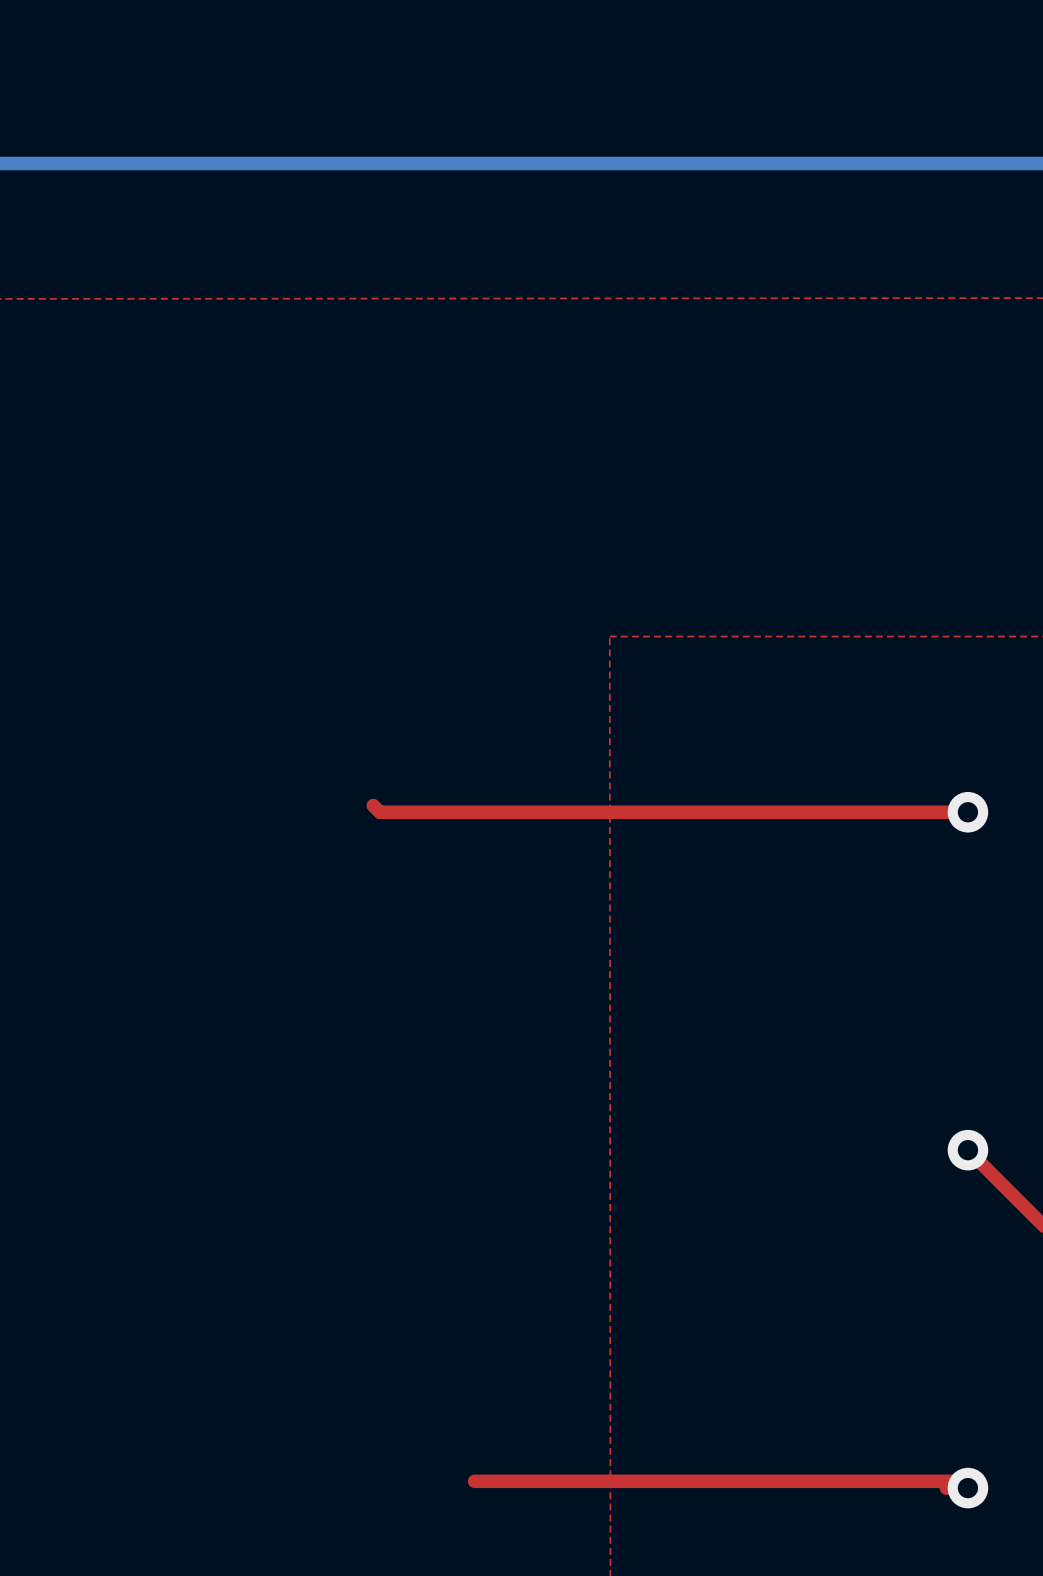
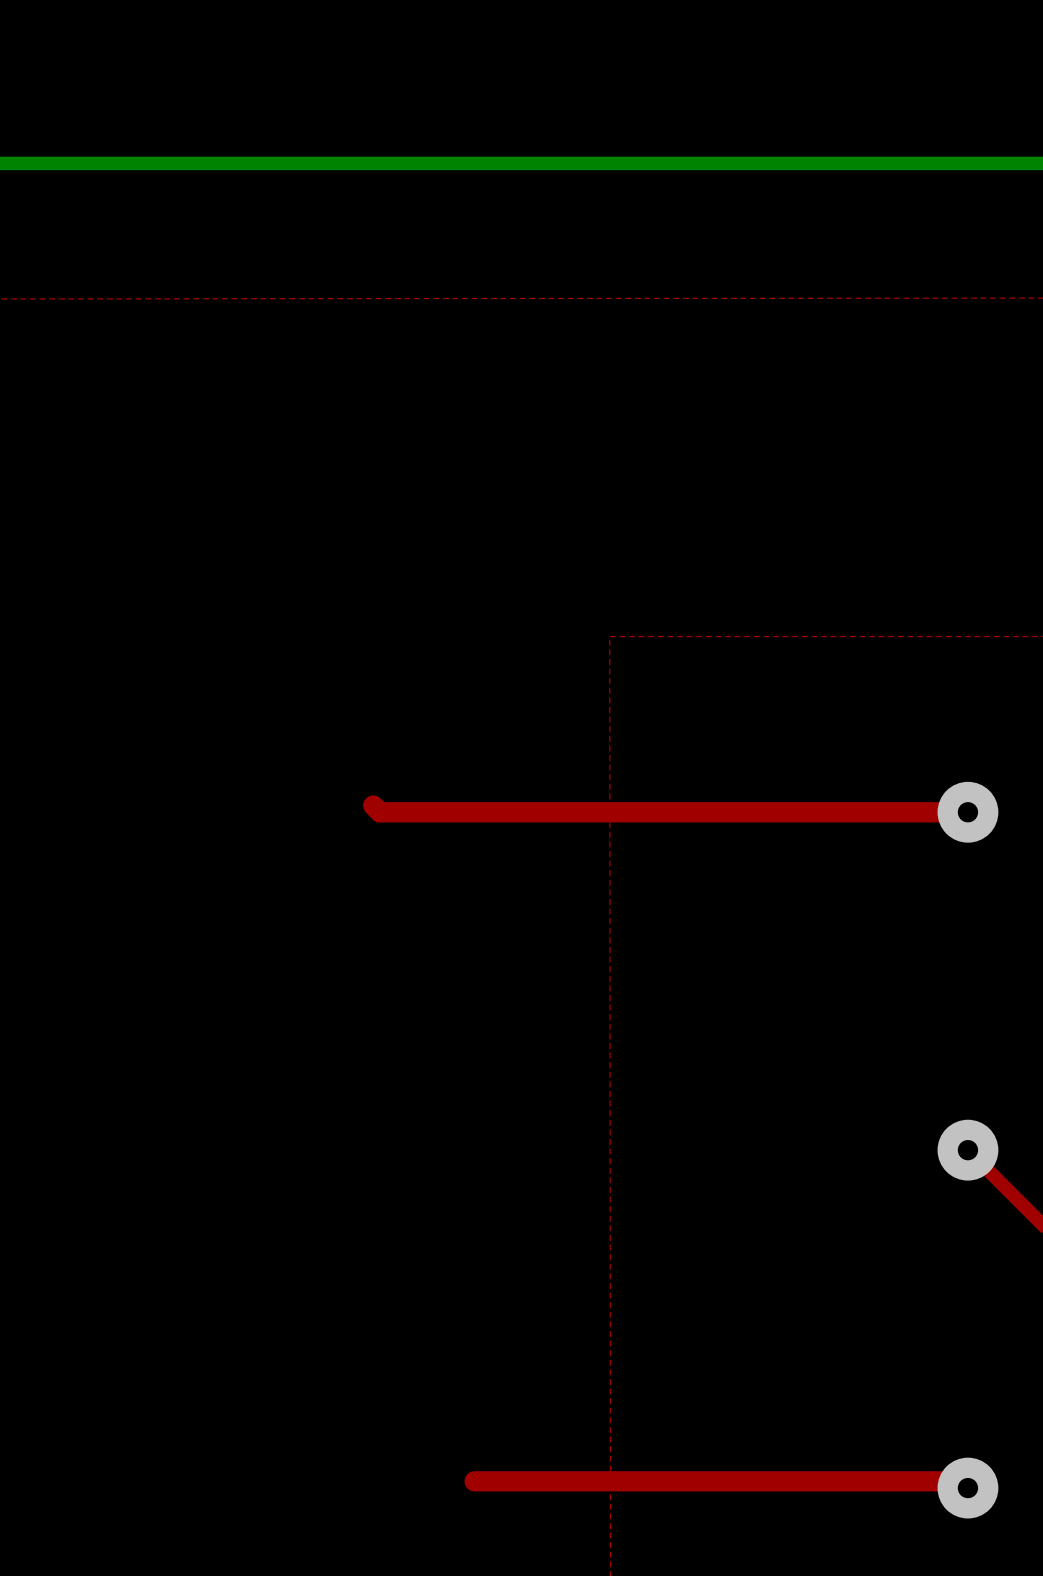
via size: [947, 791, 989, 833] -> [937, 781, 999, 843]
top track width: thin (373, 805) (379, 812) (967, 812) -> thick (373, 805) (379, 812) (967, 812)
via size: [947, 1129, 989, 1171] -> [937, 1119, 999, 1181]
via size: [947, 1467, 989, 1509] -> [937, 1457, 999, 1519]
top track width: thin (474, 1481) (961, 1481) (967, 1488) -> thick (474, 1481) (961, 1481) (967, 1488)

